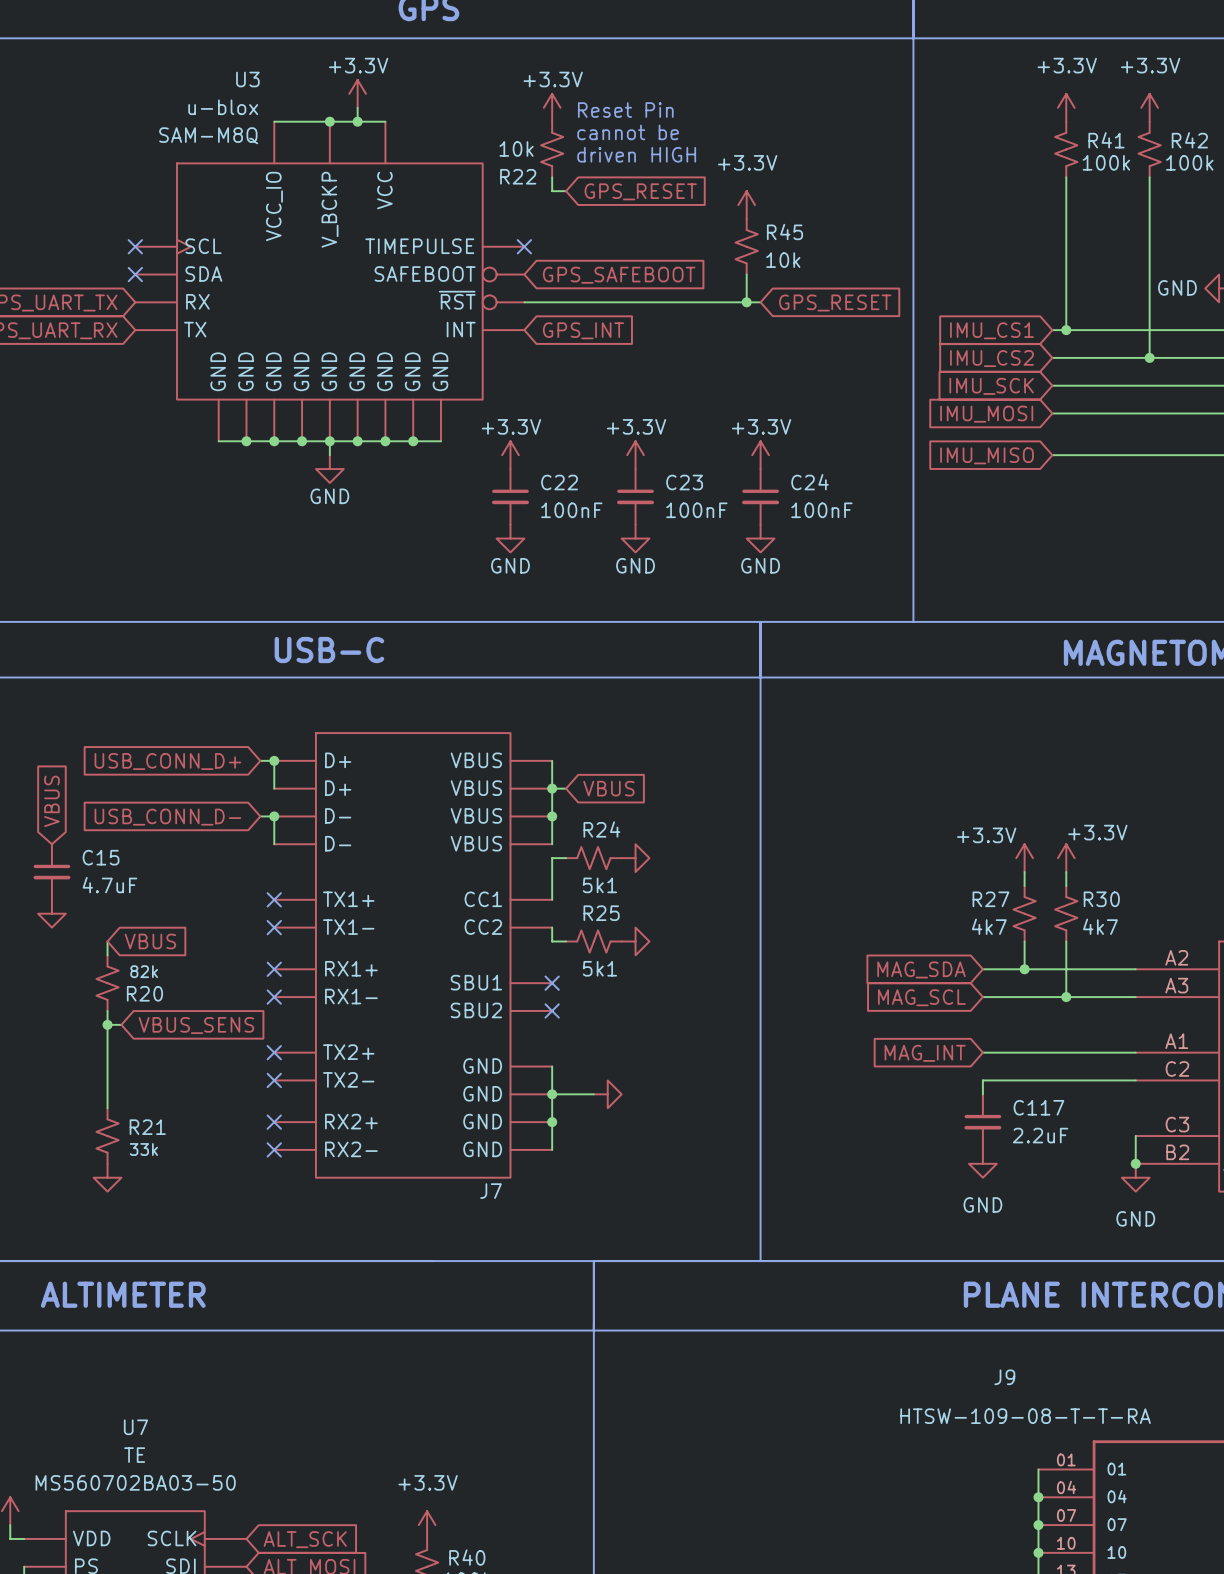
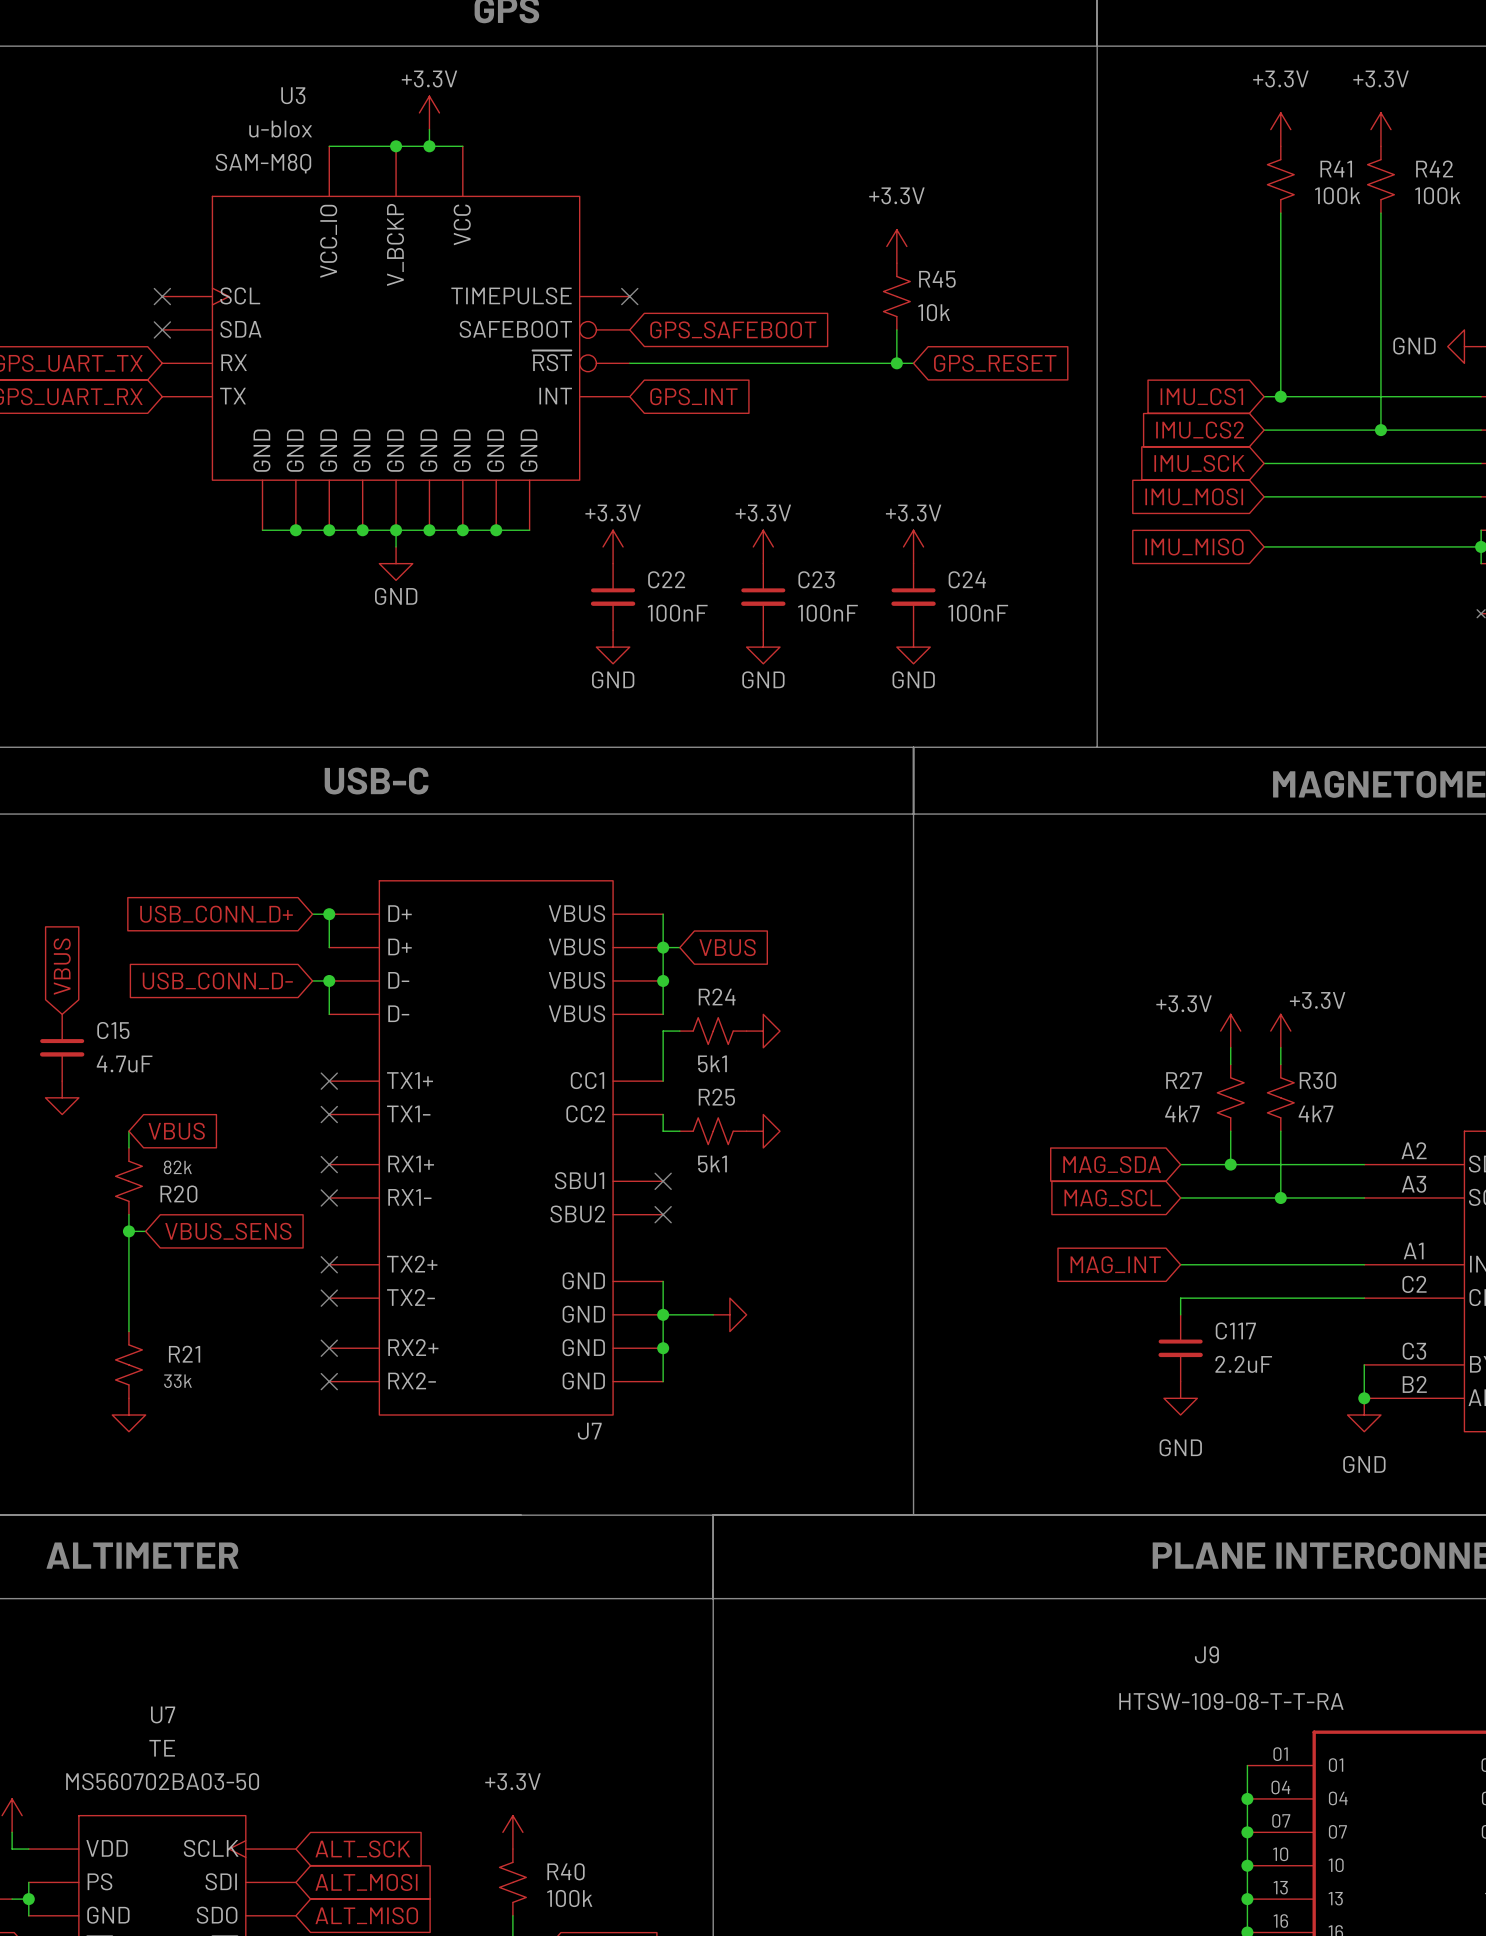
power symbol: +3.3V (552, 107) -> none
text: Reset Pin (625, 110) -> none
text: cannot be (628, 132) -> none
R22: 10k (552, 149) -> none
text: driven HIGH (636, 154) -> none
wire: (552, 177) (552, 191) (566, 191) -> none
global label: GPS_RESET (640, 191) -> none

